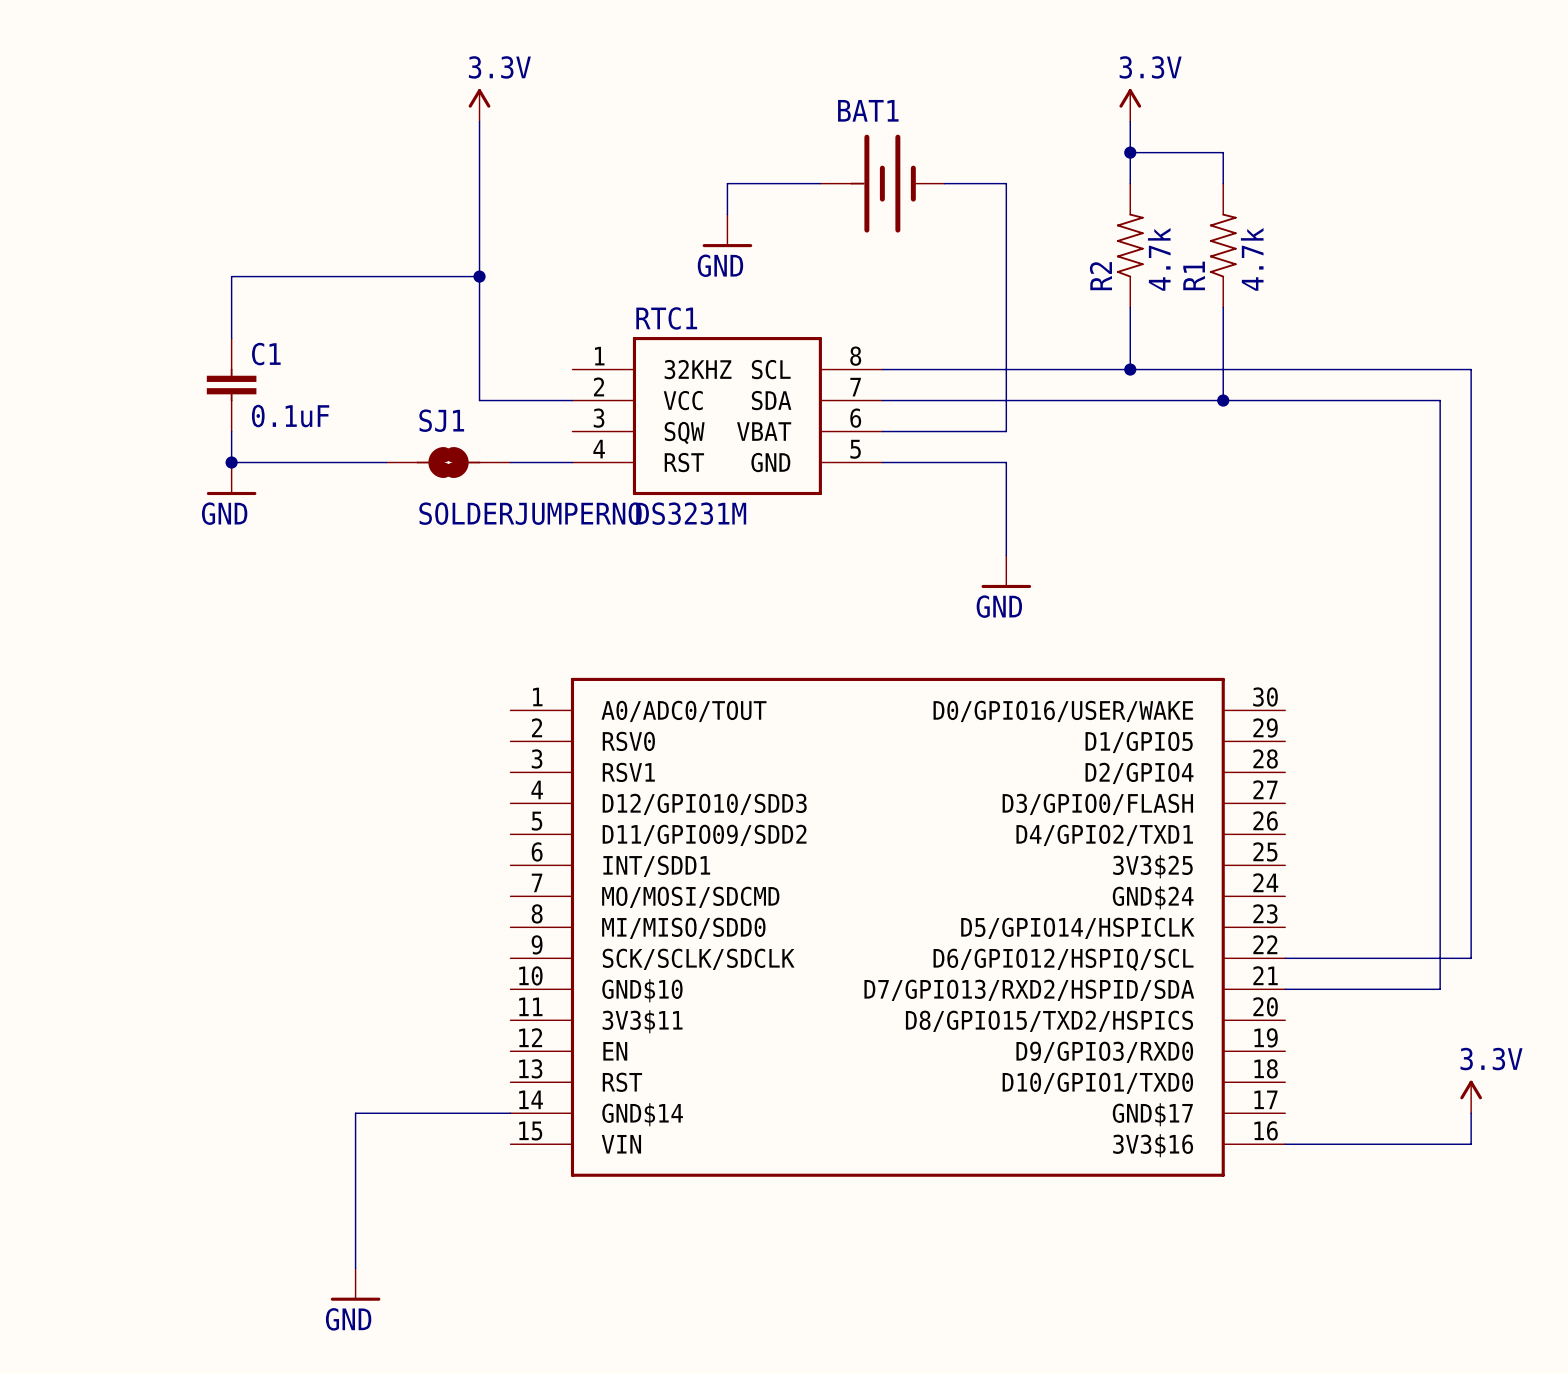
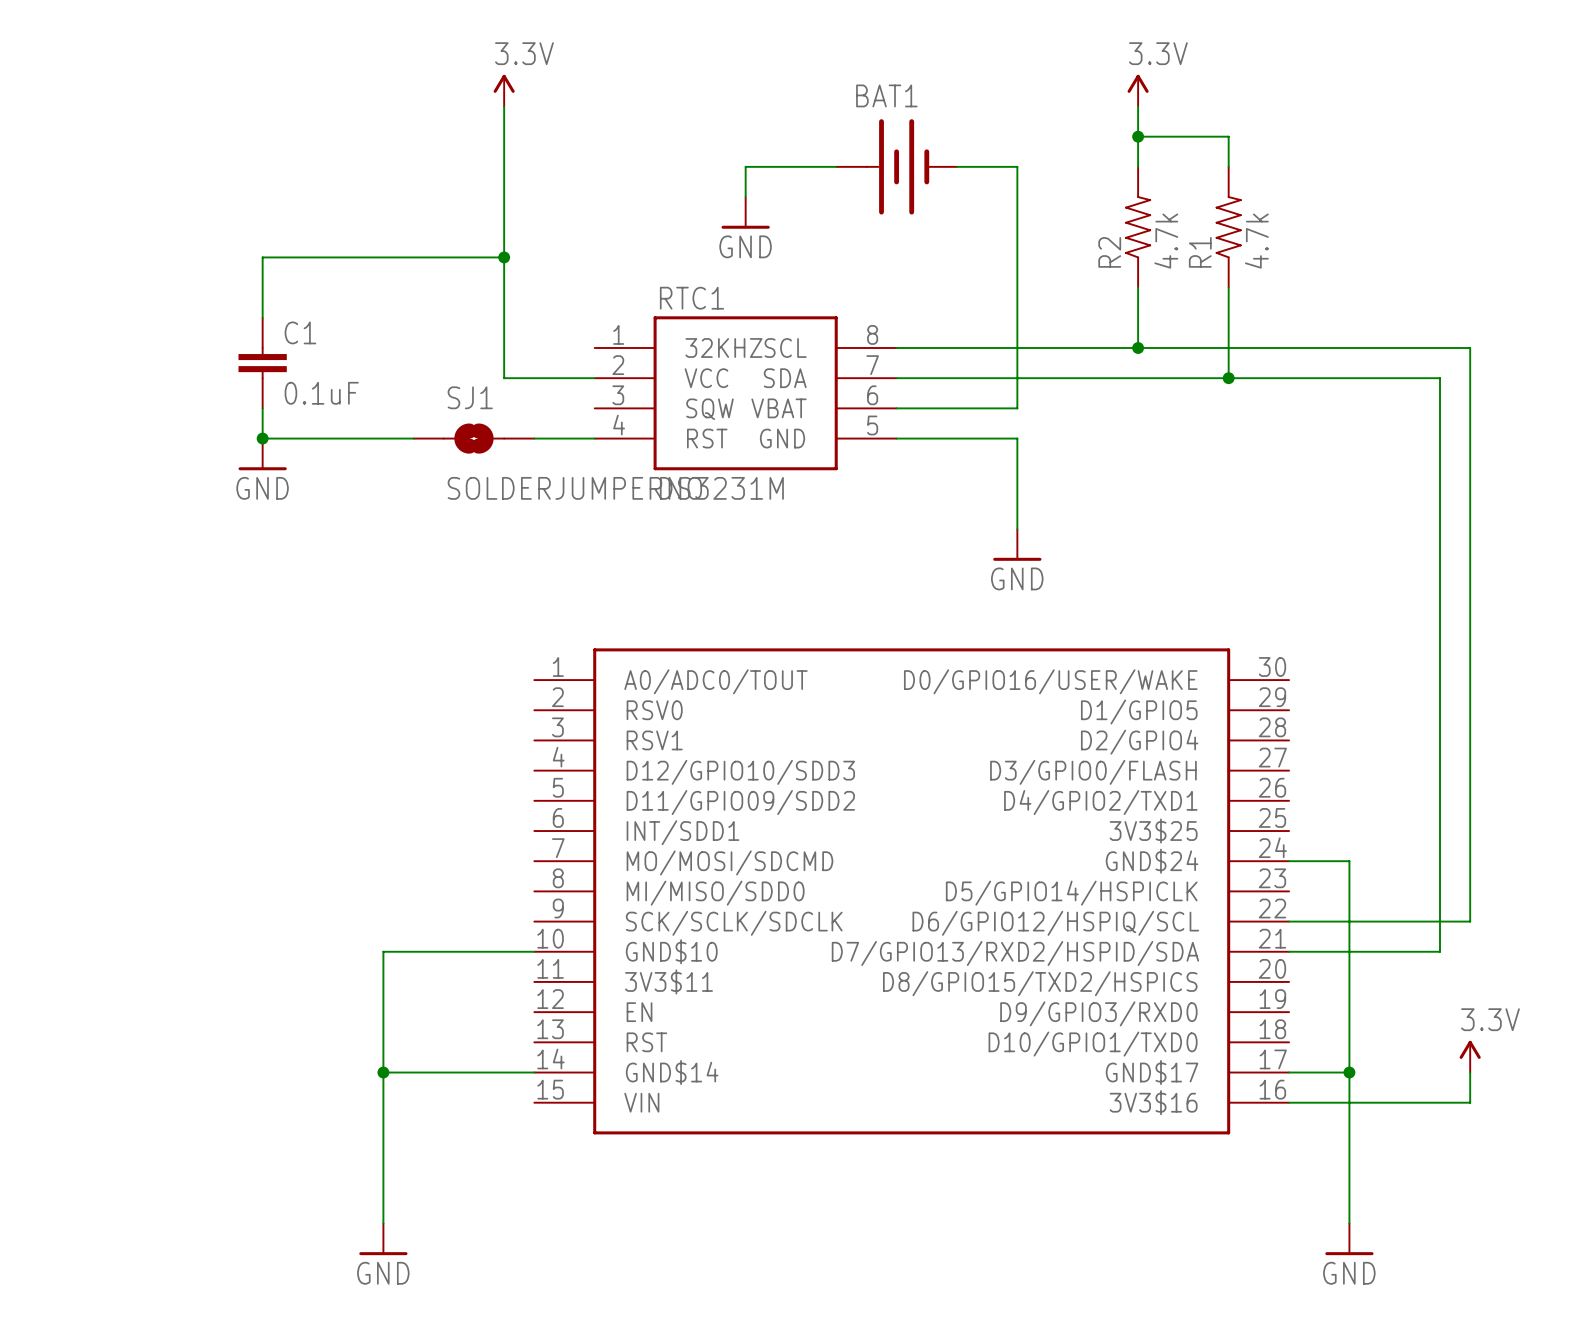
wire: none -> (1289, 861) (1349, 861) (1349, 1223)
wire: none -> (534, 951) (383, 951) (383, 1072)
junction: none -> (383, 1072)
wire: none -> (1289, 1072) (1349, 1072)
junction: none -> (1349, 1072)
power symbol: none -> GND (1349, 1239)

